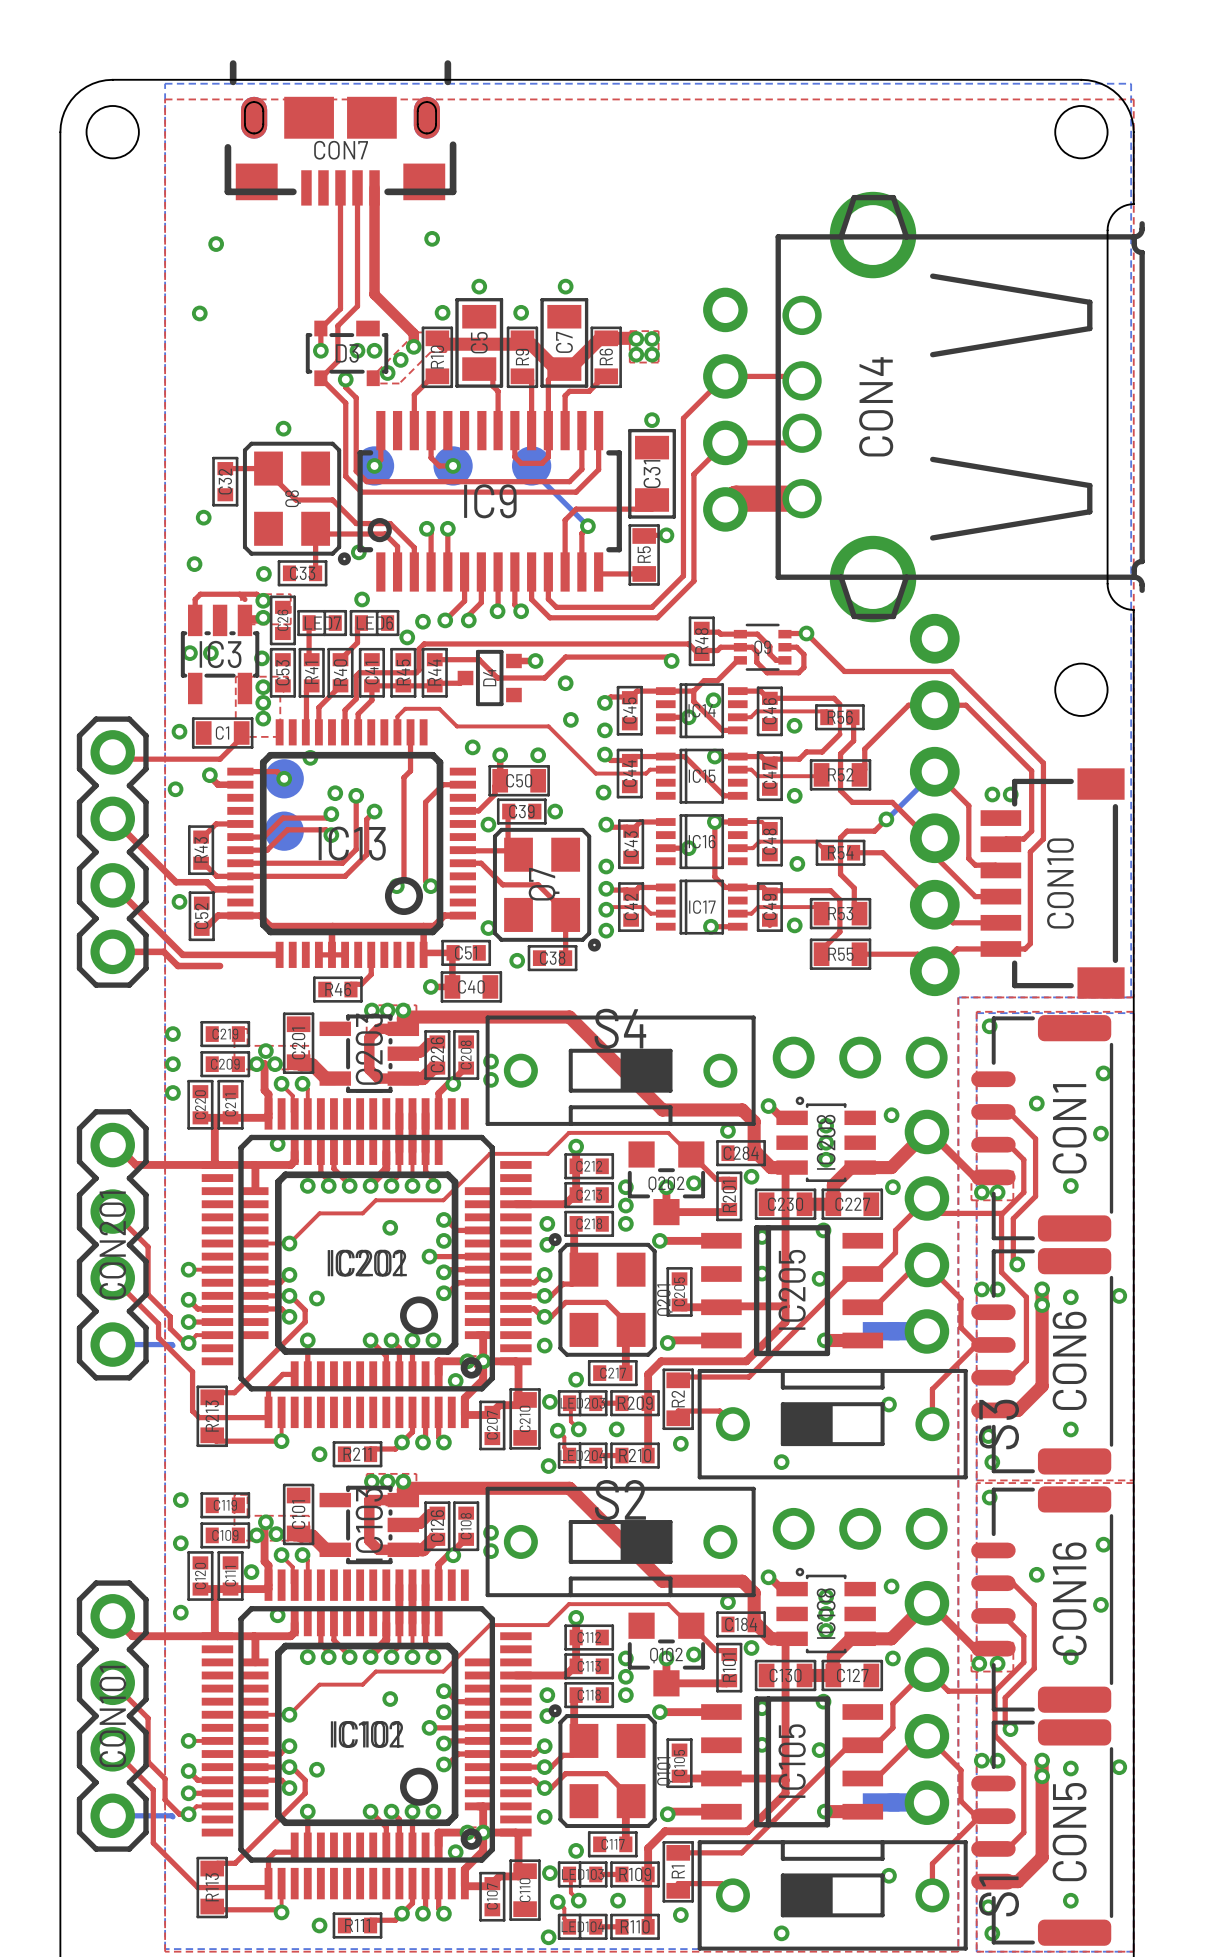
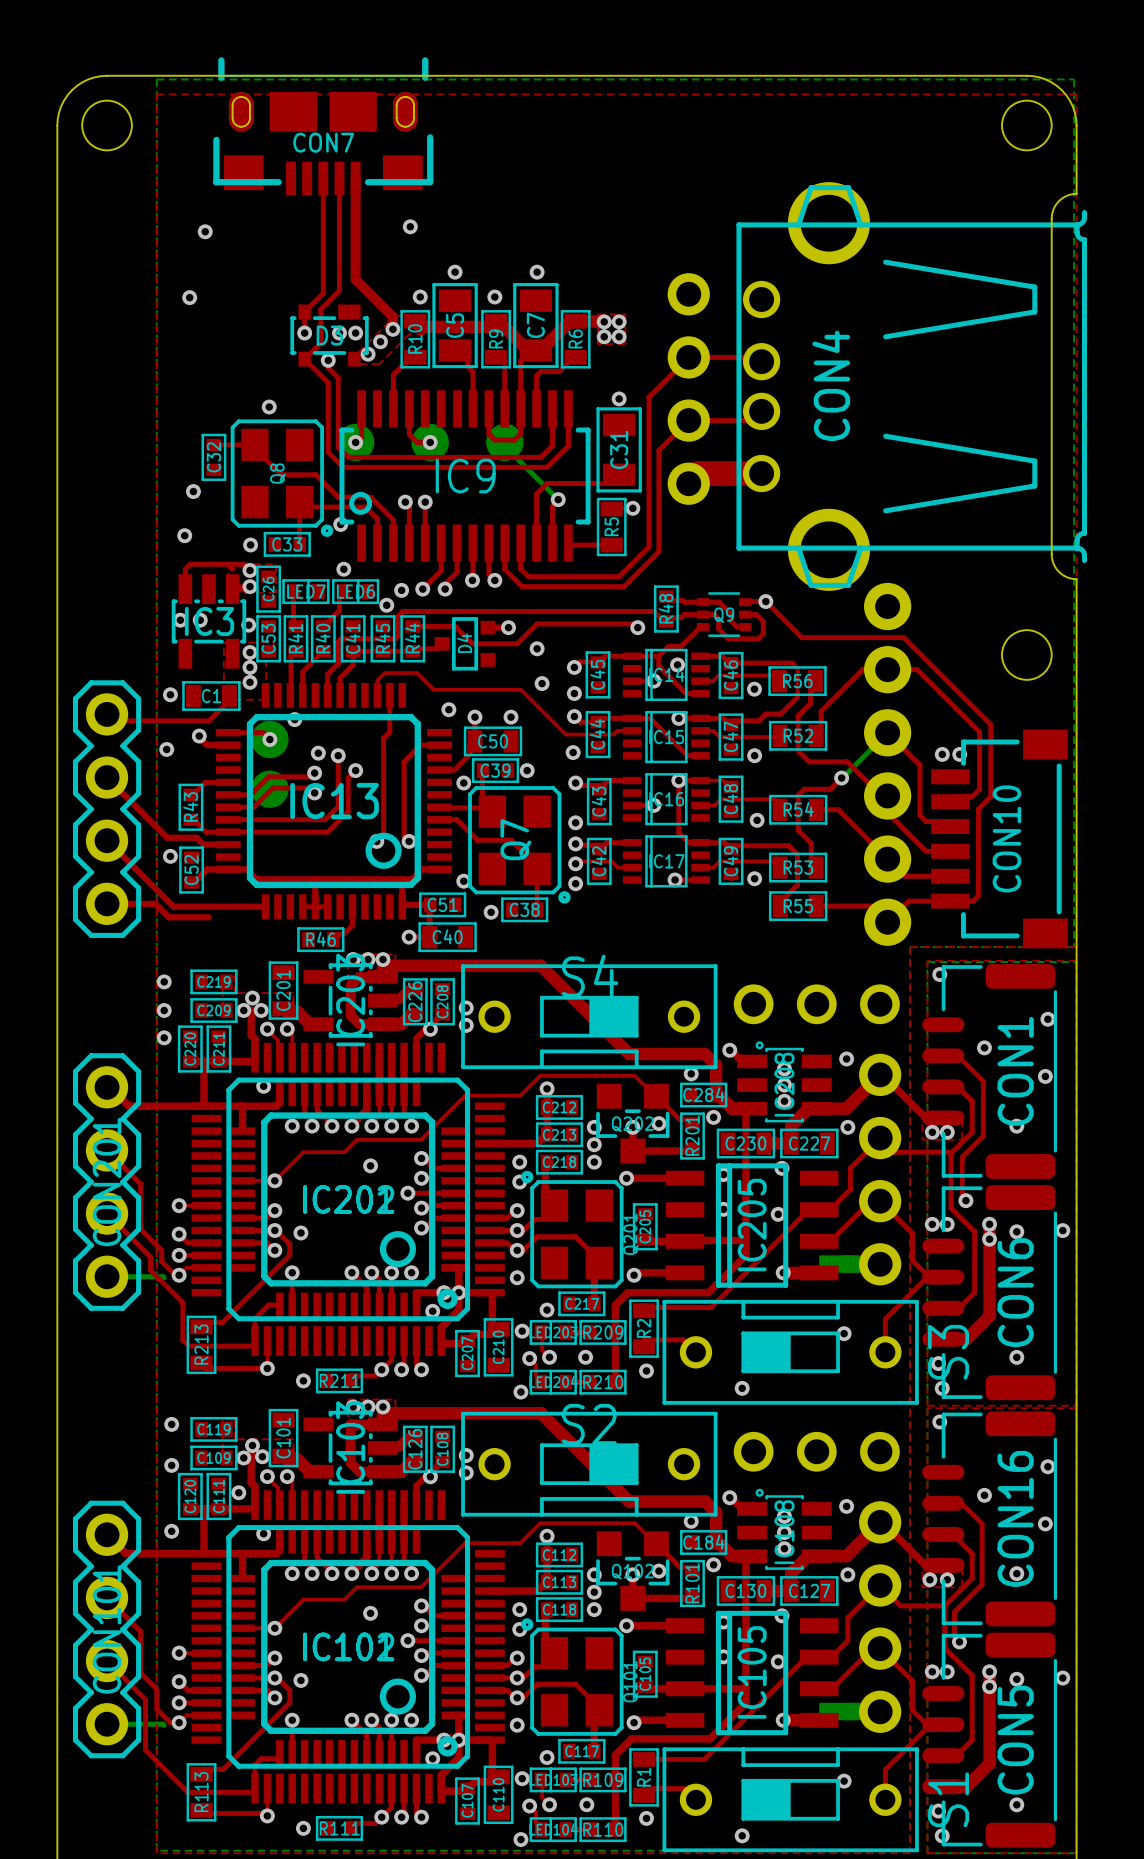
R56 footprint: [815, 704, 865, 731] -> [768, 666, 827, 697]
R54 footprint: [815, 839, 866, 866] -> [768, 794, 828, 825]

